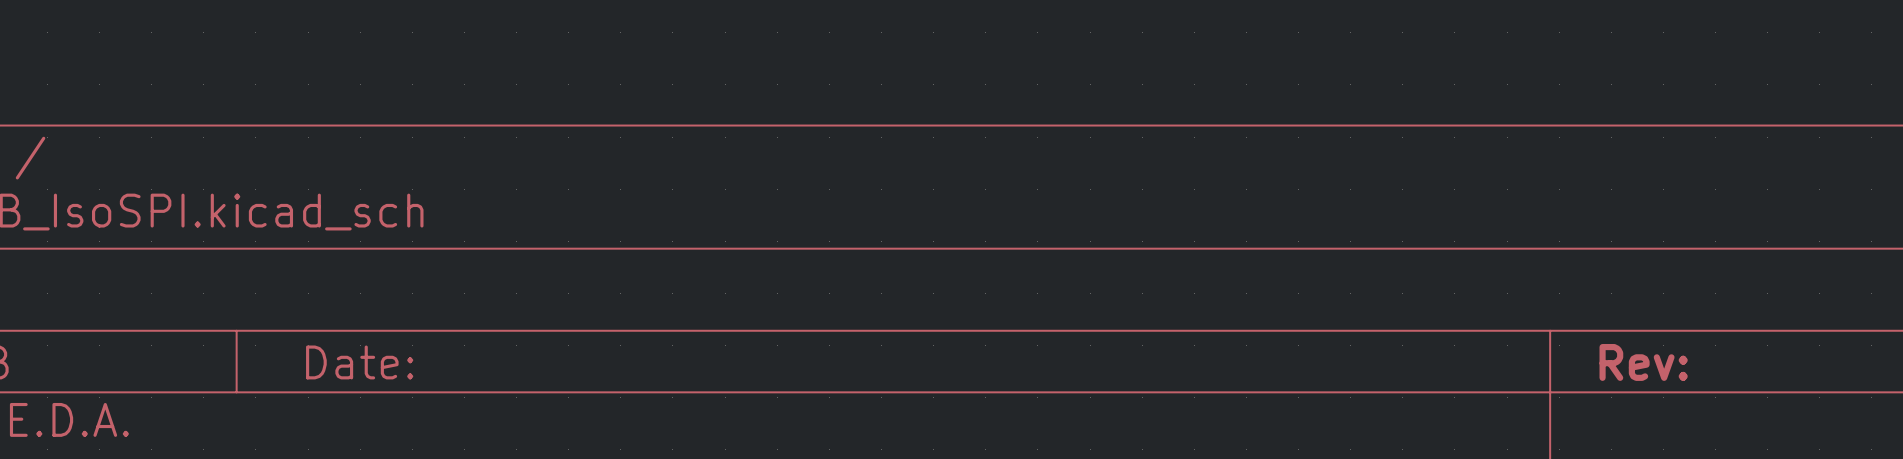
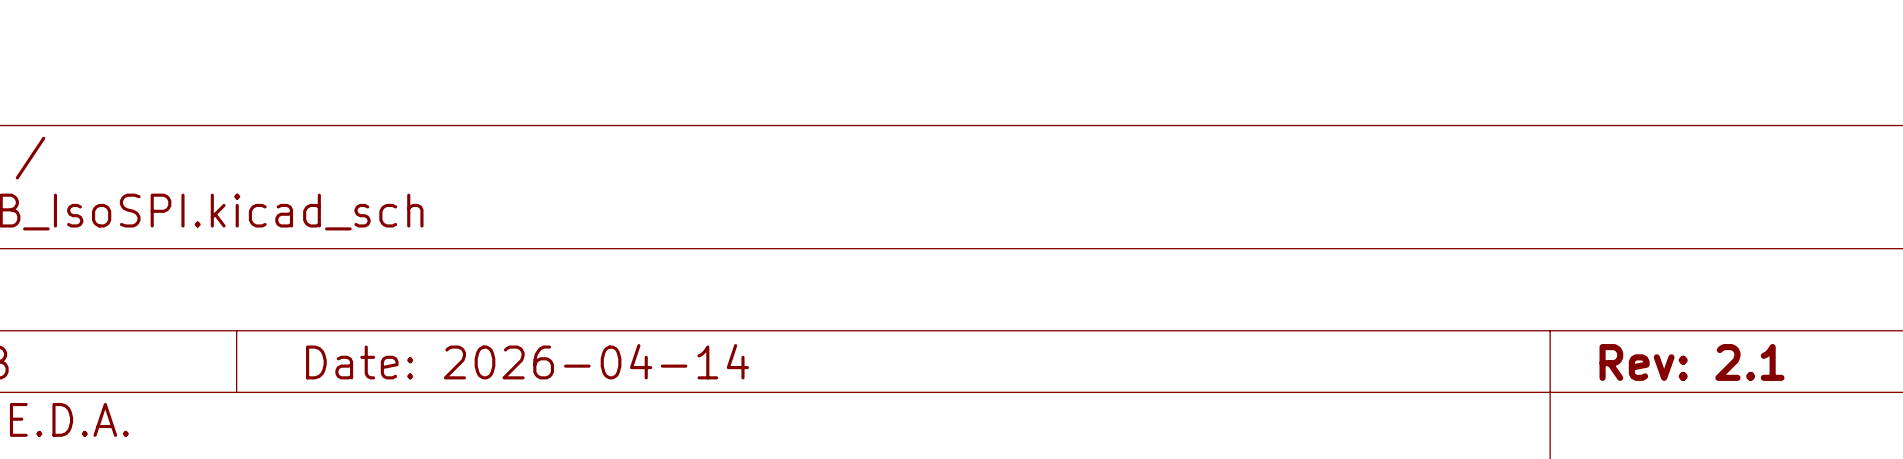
title block: Date: (359, 362) -> Date: 2026-04-14 (527, 361)
title block: Rev: (1643, 362) -> Rev: 2.1 (1692, 362)

